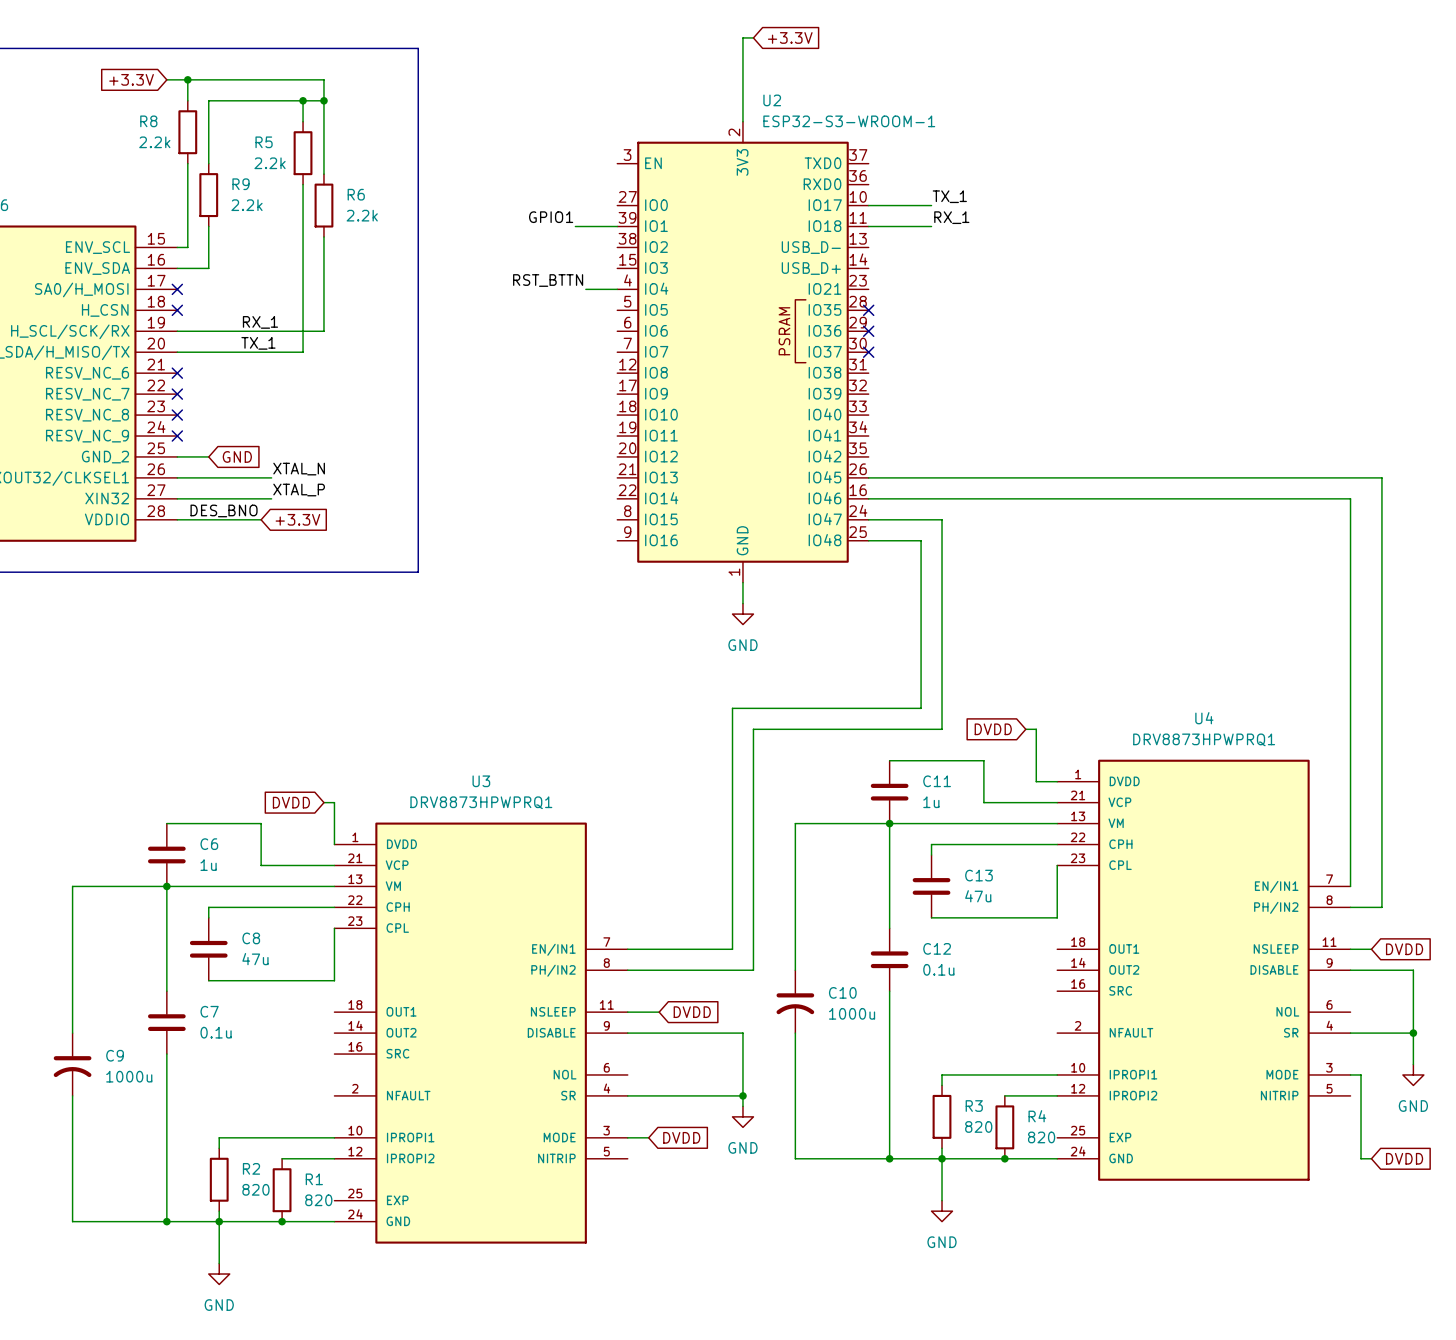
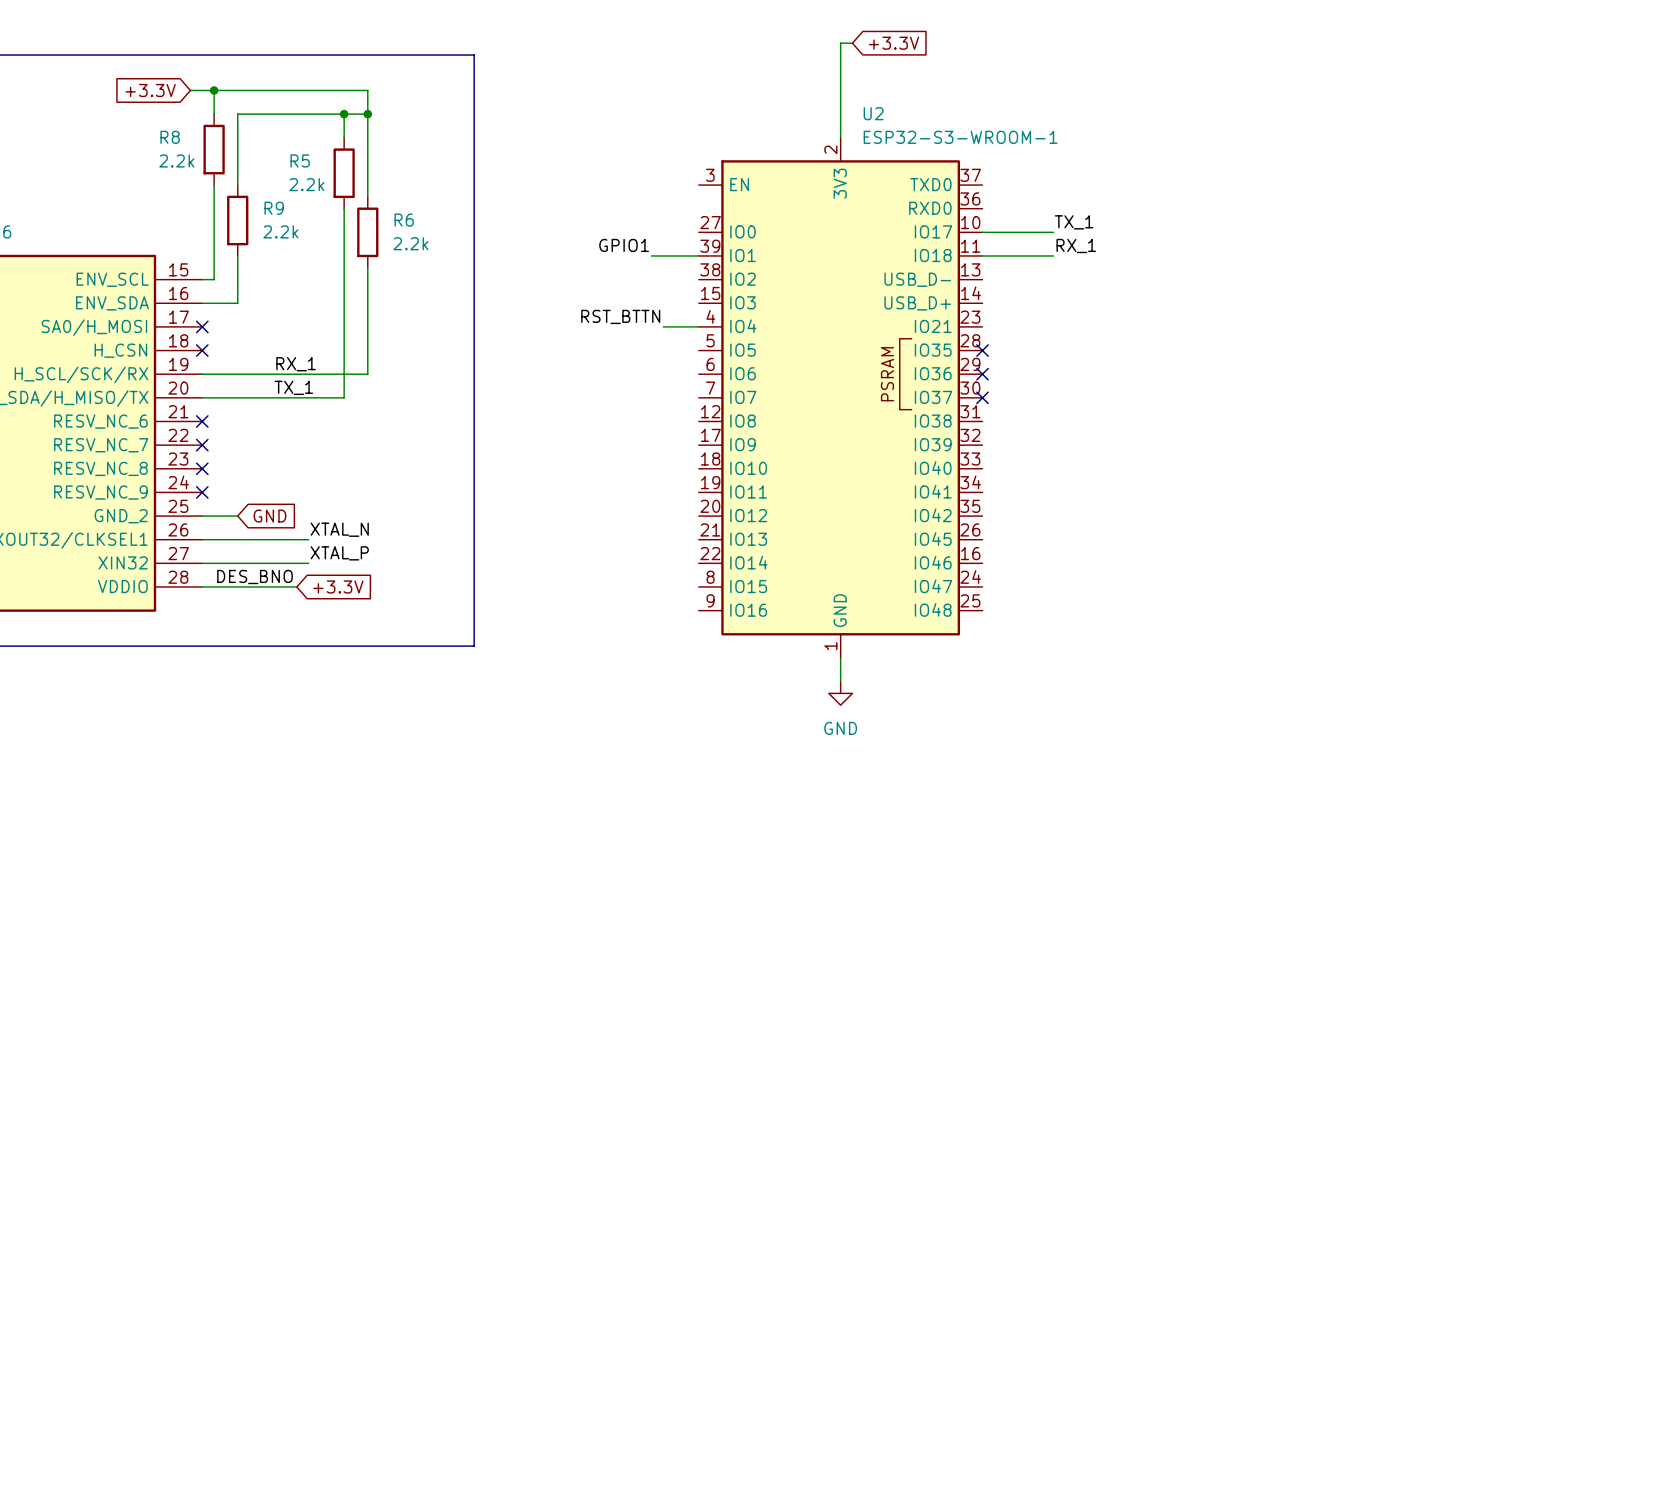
wire: (868, 477) (1381, 477) (1381, 907) (1350, 907) -> none
wire: (868, 498) (1350, 498) (1350, 886) -> none
wire: (868, 519) (942, 519) (942, 729) (753, 729) (753, 970) (627, 970) -> none
wire: (868, 540) (921, 540) (921, 708) (732, 708) (732, 949) (627, 949) -> none
global label: DVDD (993, 729) -> none
wire: (1025, 729) (1036, 729) (1036, 781) (1057, 781) -> none
wire: (889, 760) (983, 760) (983, 802) (1057, 802) -> none
C11: 1u (889, 792) -> none
global label: DVDD (291, 802) -> none
wire: (323, 802) (334, 802) (334, 844) -> none
wire: (166, 823) (261, 823) (261, 865) (334, 865) -> none
wire: (889, 823) (889, 928) -> none
junction: (889, 823) -> none
wire: (1057, 823) (795, 823) (795, 970) -> none
wire: (1057, 844) (931, 844) (931, 855) -> none
C6: 1u (166, 855) -> none
wire: (1057, 865) (1057, 917) (931, 917) -> none
wire: (166, 886) (166, 991) -> none
junction: (166, 886) -> none
wire: (334, 886) (72, 886) (72, 1033) -> none
C13: 47u (931, 886) -> none
wire: (334, 907) (208, 907) (208, 917) -> none
wire: (334, 928) (334, 980) (208, 980) -> none
C8: 47u (208, 949) -> none
wire: (1350, 949) (1371, 949) -> none
global label: DVDD (1404, 949) -> none
C12: 0.1u (889, 959) -> none
U4: DRV8873HPWPRQ1 (1203, 970) -> none
wire: (1350, 970) (1413, 970) (1413, 1064) -> none
wire: (889, 991) (889, 1158) -> none
C10: 1000u (795, 1001) -> none
wire: (627, 1012) (659, 1012) -> none
global label: DVDD (692, 1012) -> none
C7: 0.1u (166, 1022) -> none
U3: DRV8873HPWPRQ1 (481, 1033) -> none
wire: (627, 1033) (742, 1033) (742, 1106) -> none
wire: (795, 1033) (795, 1158) (1057, 1158) -> none
wire: (1350, 1033) (1413, 1033) -> none
junction: (1413, 1033) -> none
wire: (166, 1054) (166, 1221) -> none
C9: 1000u (72, 1064) -> none
wire: (1057, 1074) (942, 1074) (942, 1085) -> none
wire: (1350, 1074) (1361, 1074) (1361, 1158) (1371, 1158) -> none
power symbol: GND (1413, 1074) -> none
wire: (72, 1095) (72, 1221) (334, 1221) -> none
wire: (627, 1095) (742, 1095) -> none
junction: (742, 1095) -> none
wire: (1004, 1095) (1057, 1095) -> none
power symbol: GND (742, 1116) -> none
R3: 820 (942, 1116) -> none
R4: 820 (1004, 1127) -> none
wire: (334, 1137) (219, 1137) (219, 1148) -> none
wire: (627, 1137) (648, 1137) -> none
global label: DVDD (681, 1137) -> none
wire: (942, 1148) (942, 1200) -> none
wire: (282, 1158) (334, 1158) -> none
junction: (889, 1158) -> none
junction: (942, 1158) -> none
junction: (1004, 1158) -> none
global label: DVDD (1404, 1158) -> none
R2: 820 (219, 1179) -> none
R1: 820 (282, 1190) -> none
wire: (219, 1211) (219, 1263) -> none
power symbol: GND (942, 1211) -> none
junction: (166, 1221) -> none
junction: (219, 1221) -> none
junction: (282, 1221) -> none
power symbol: GND (219, 1274) -> none

